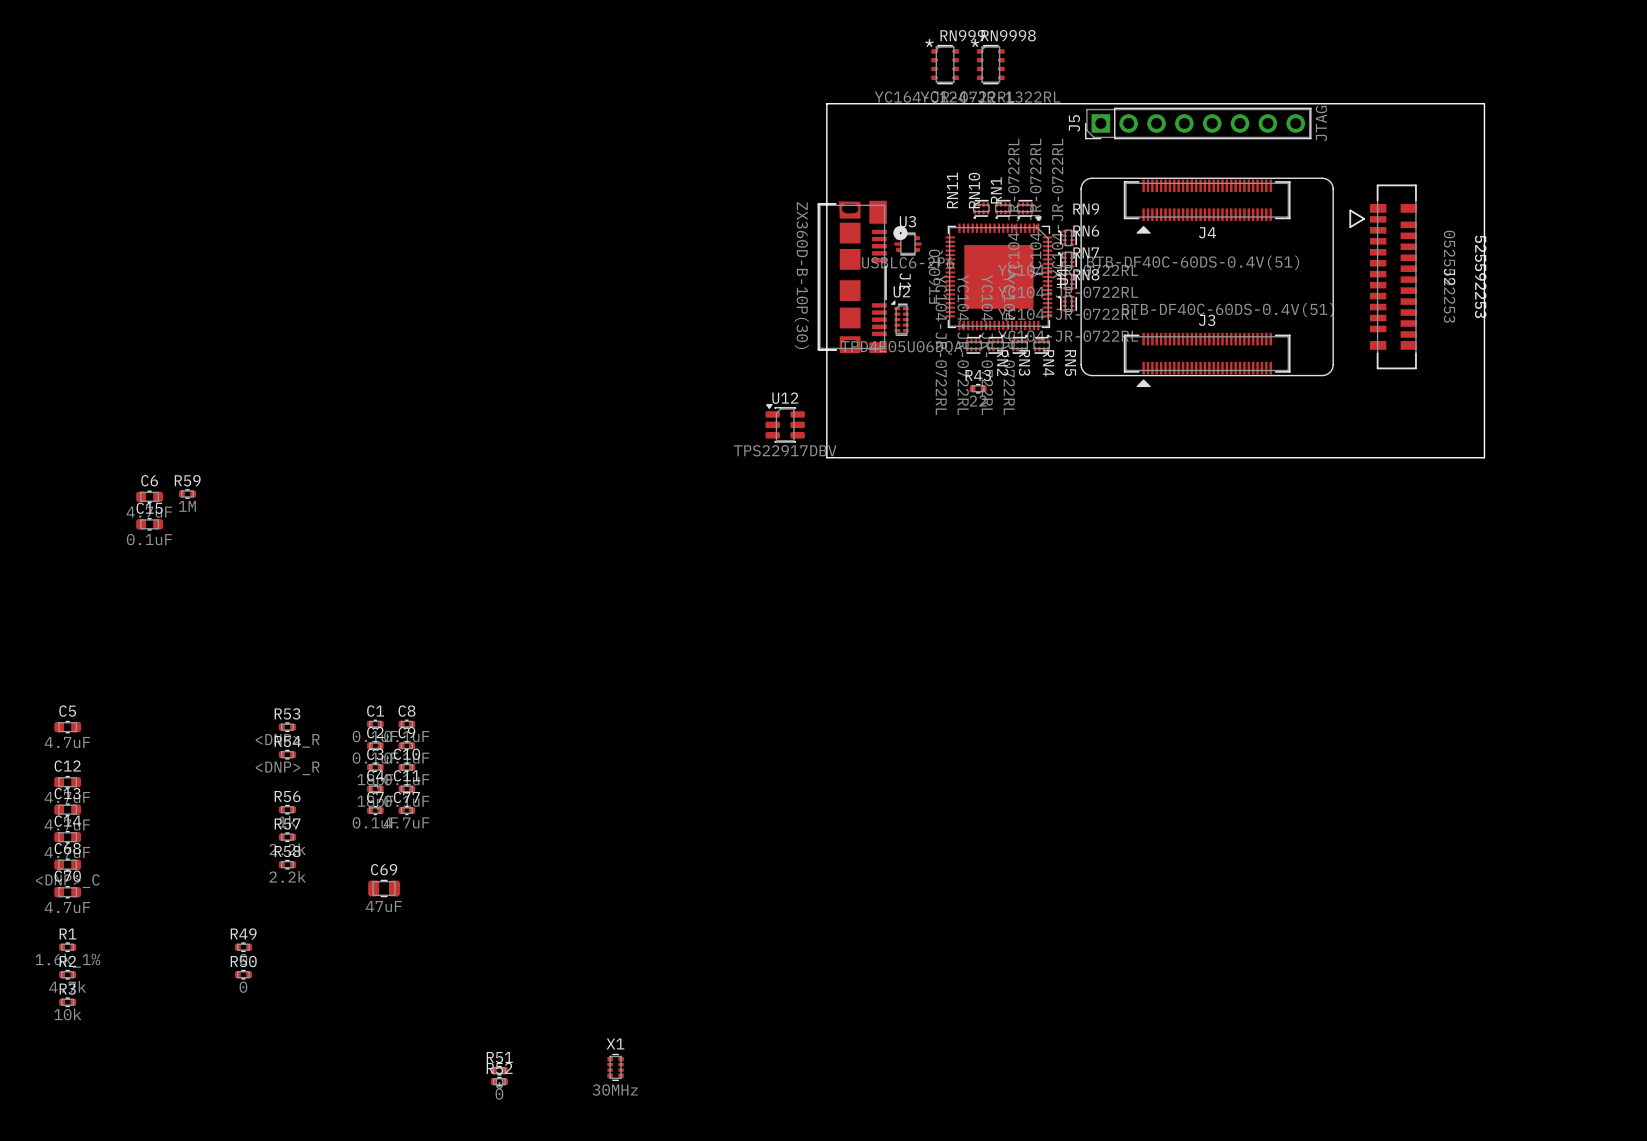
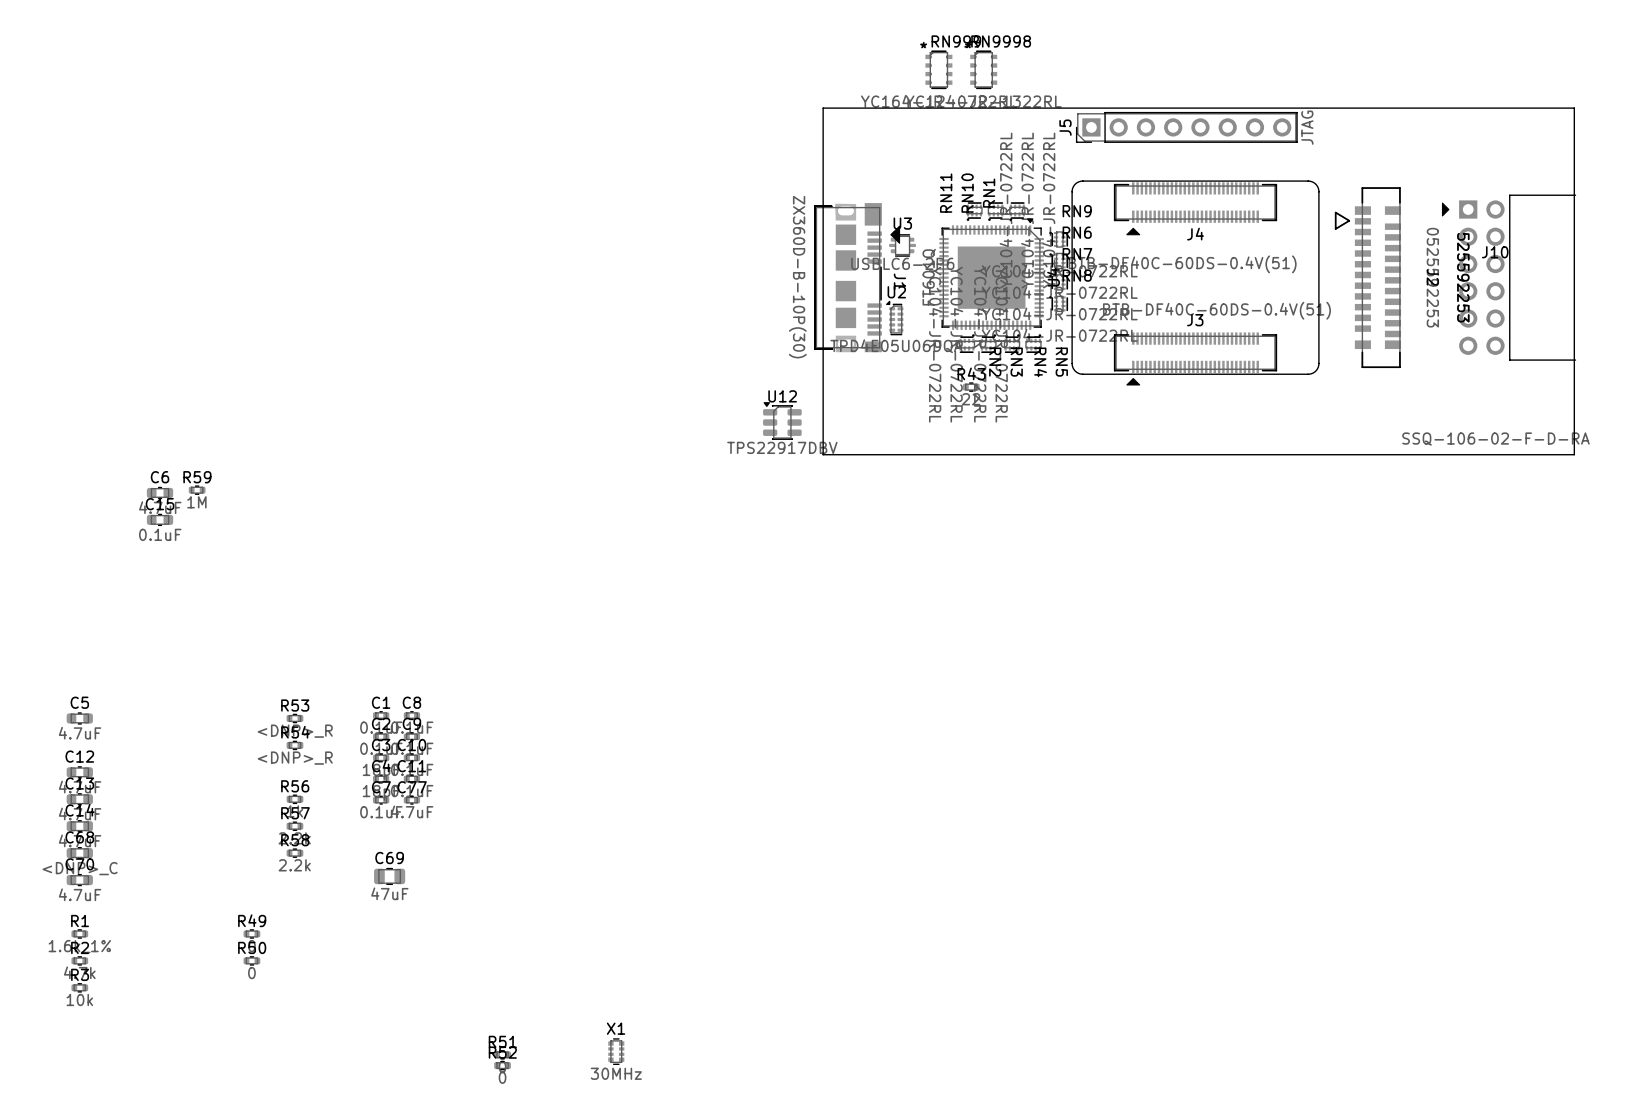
board edge: (1484, 103) (1484, 457) -> (1467, 108) (1574, 108) (1574, 454) (1467, 454)
J1 footprint: [817, 200, 908, 354] -> [814, 203, 901, 353]
J10: none -> SSQ-106-02-F-D-RA (1509, 277)

